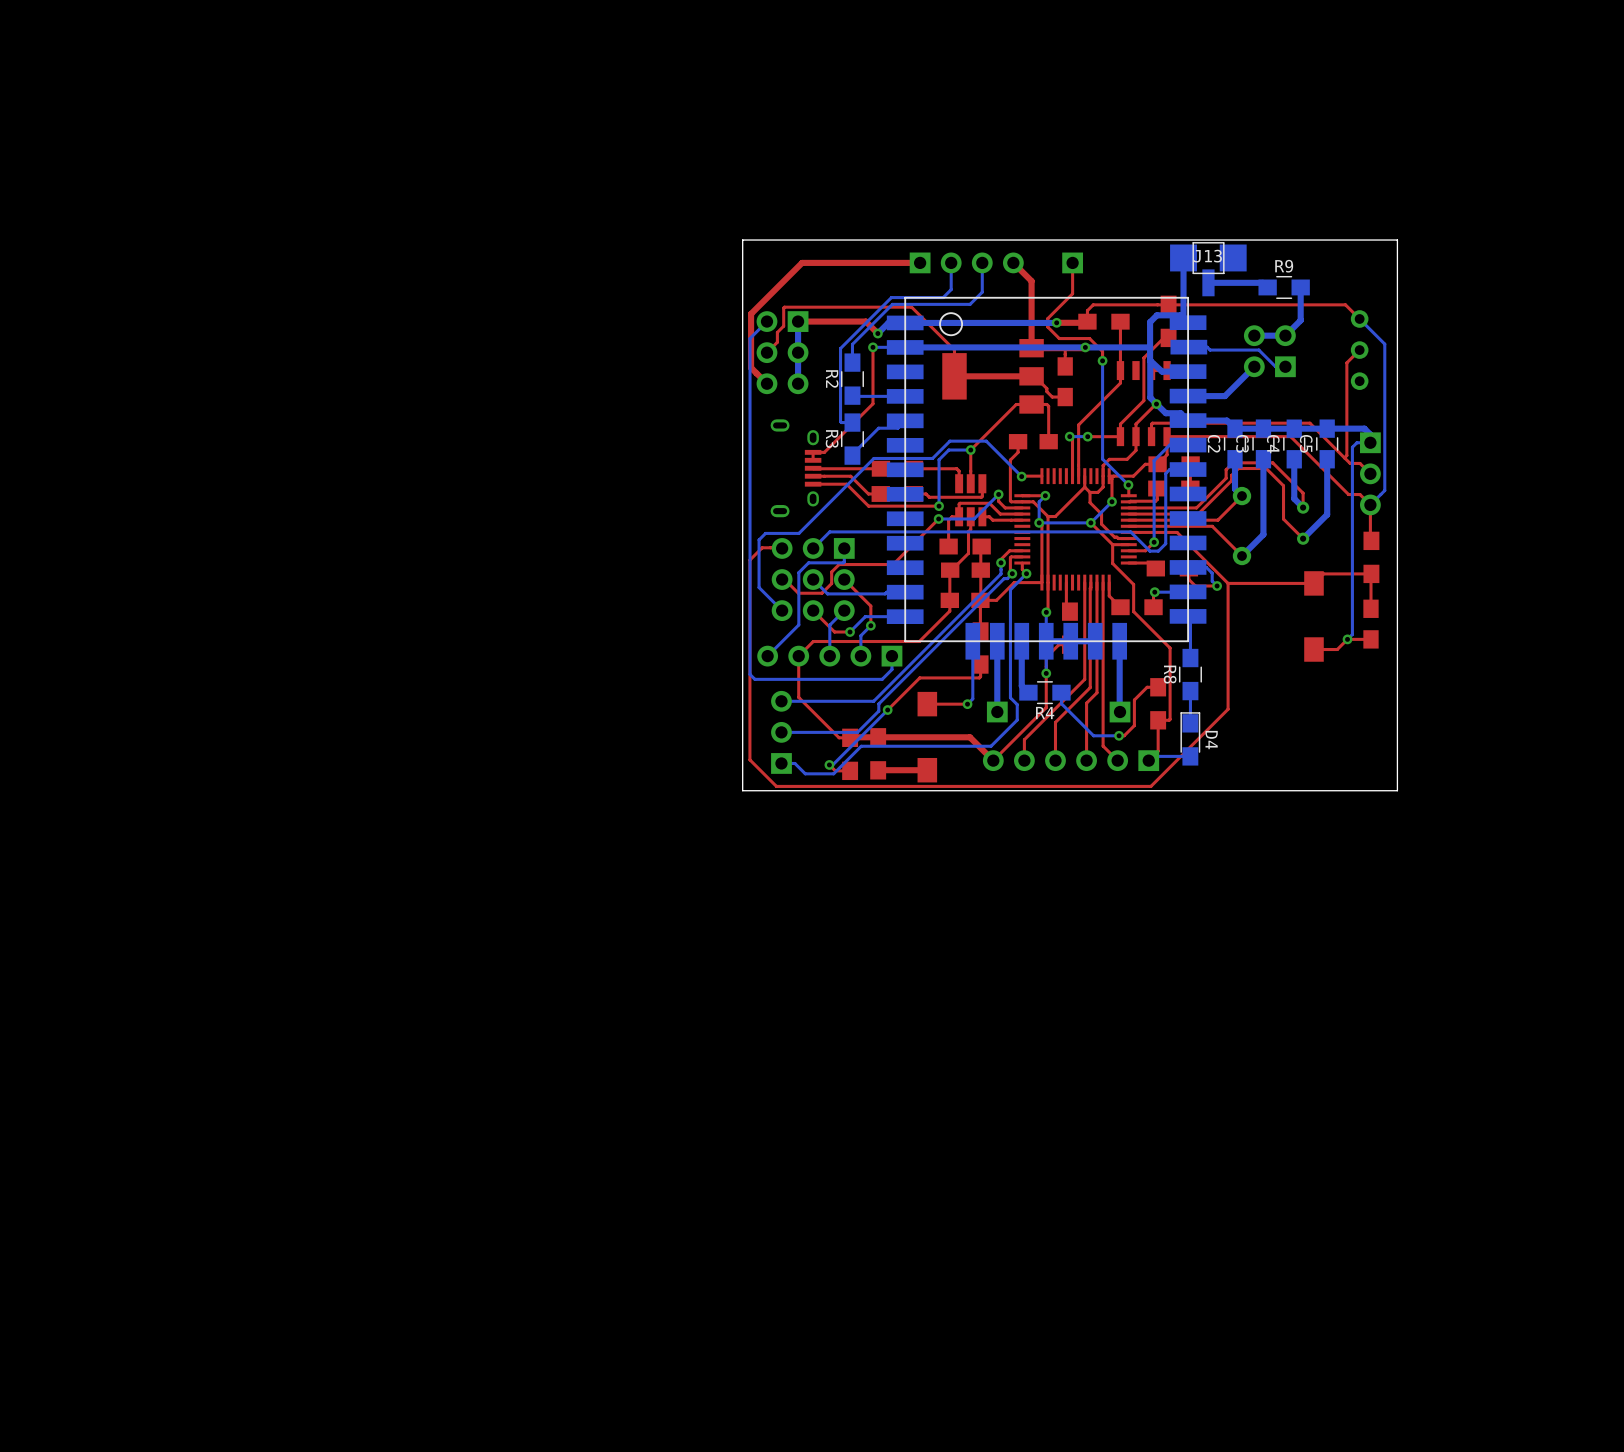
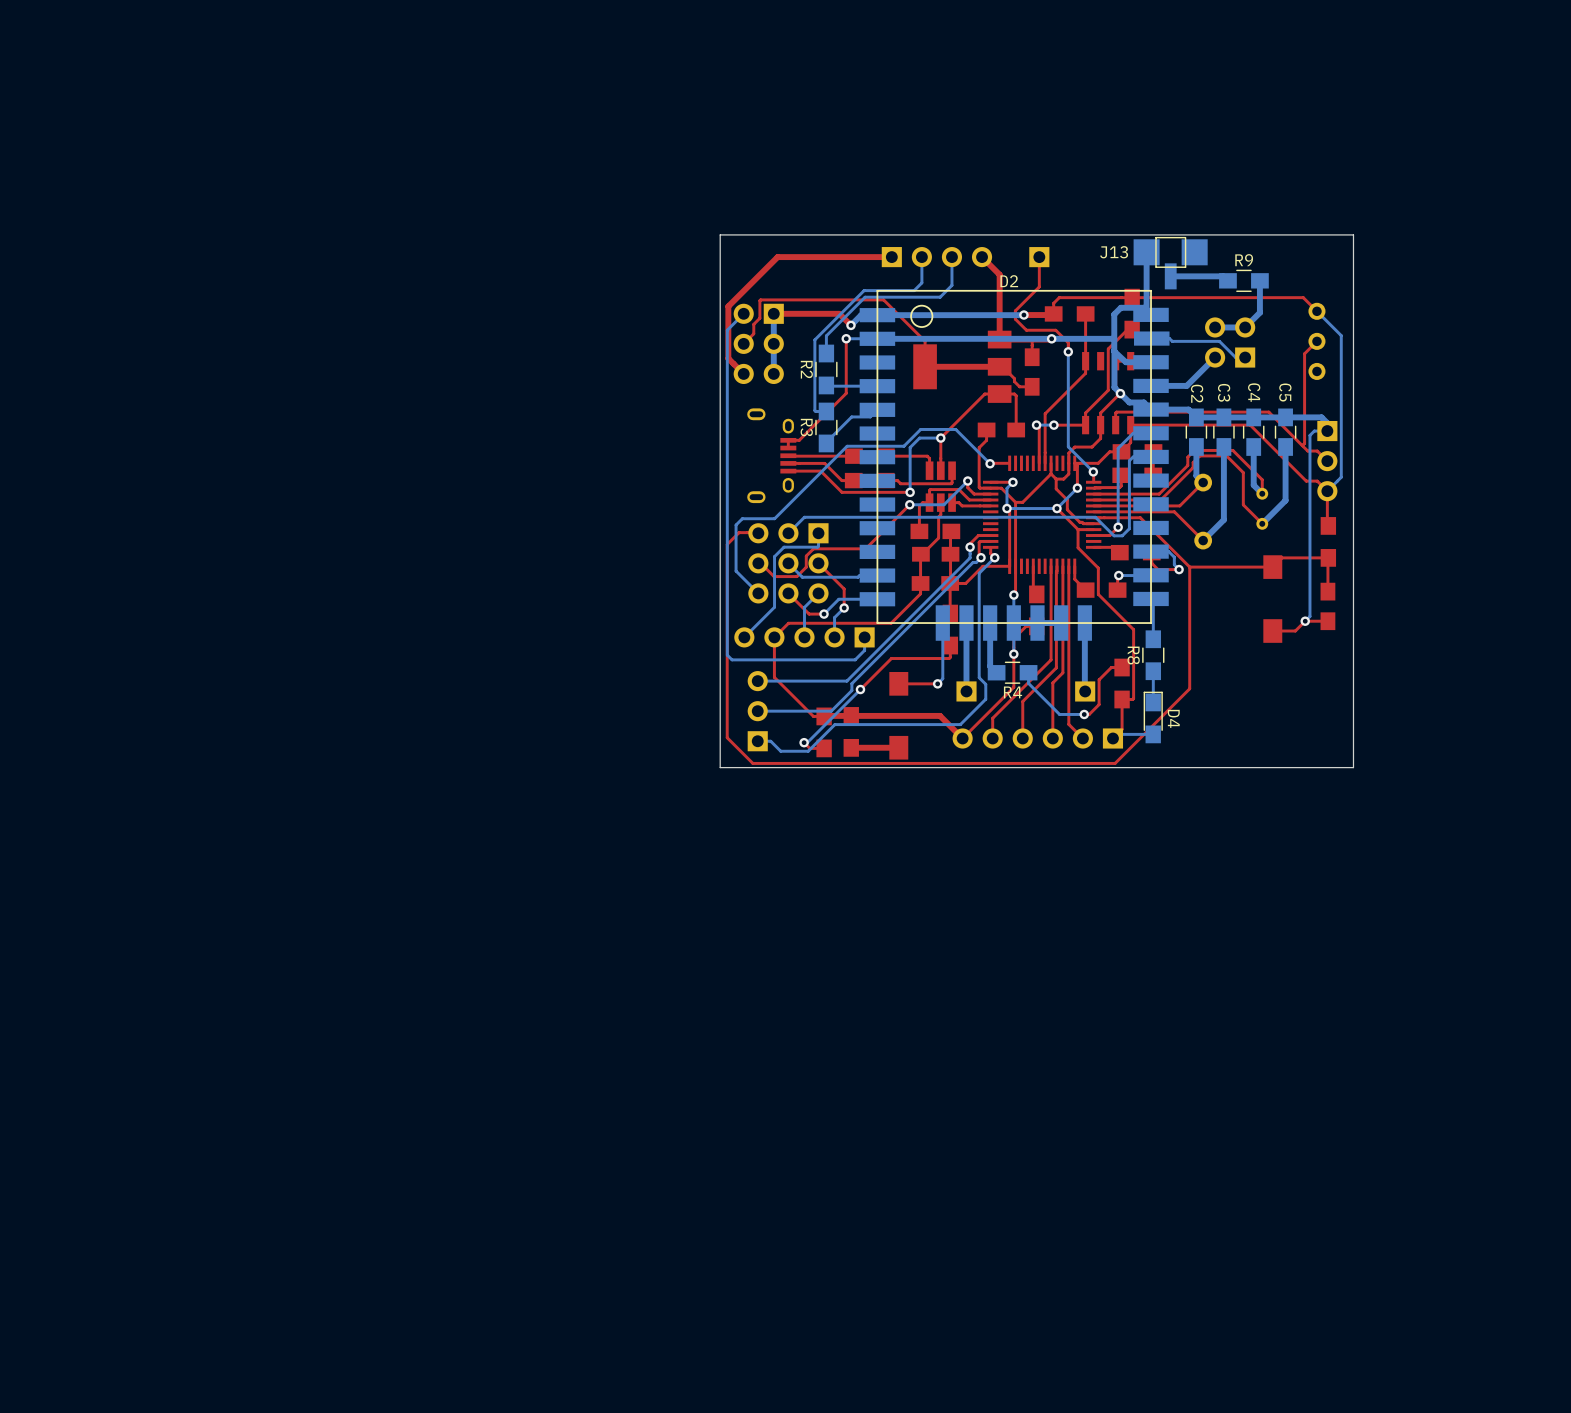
J13 name position: J13 (1207, 256) -> J13 (1114, 252)
D2 name: none -> D2 (1009, 281)
C2 name position: C2 (1214, 443) -> C2 (1197, 393)
C3 name position: C3 (1242, 443) -> C3 (1224, 392)
C5 name position: C5 (1306, 443) -> C5 (1285, 392)
C4 name position: C4 (1273, 444) -> C4 (1254, 392)

